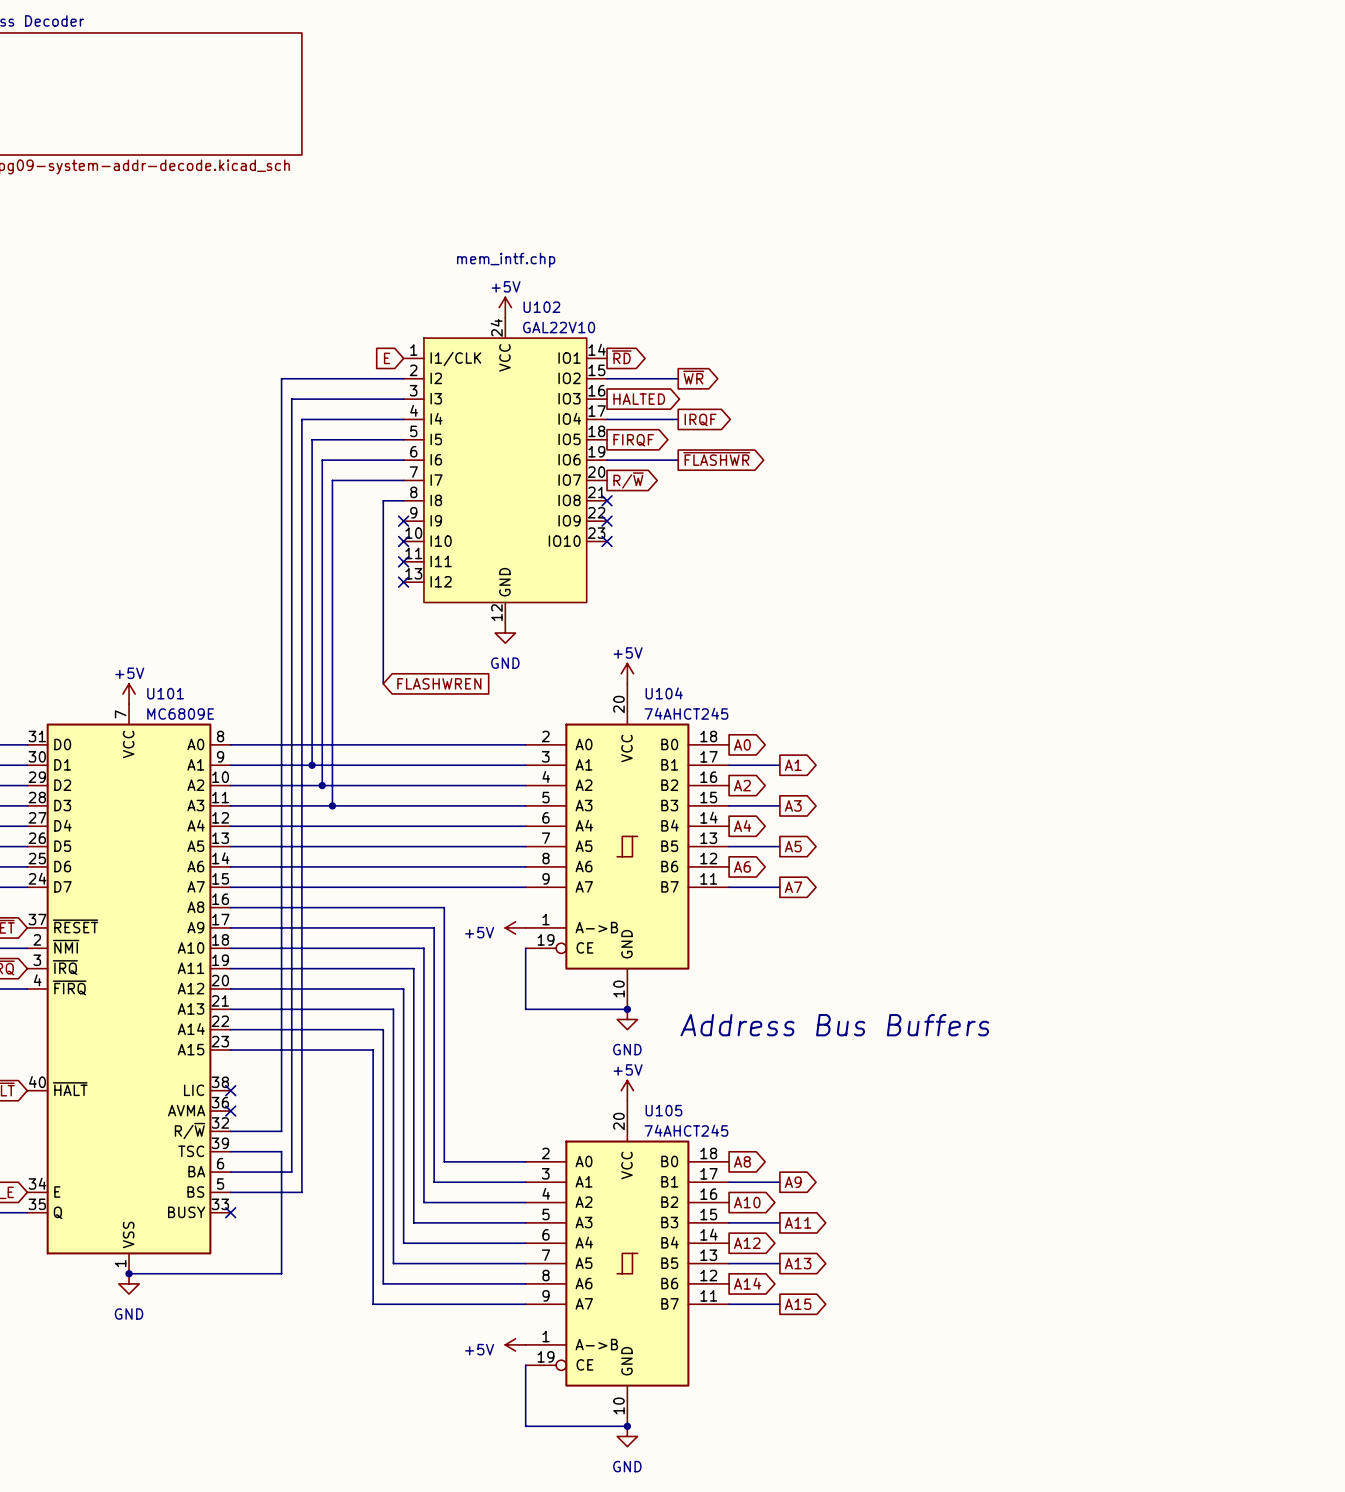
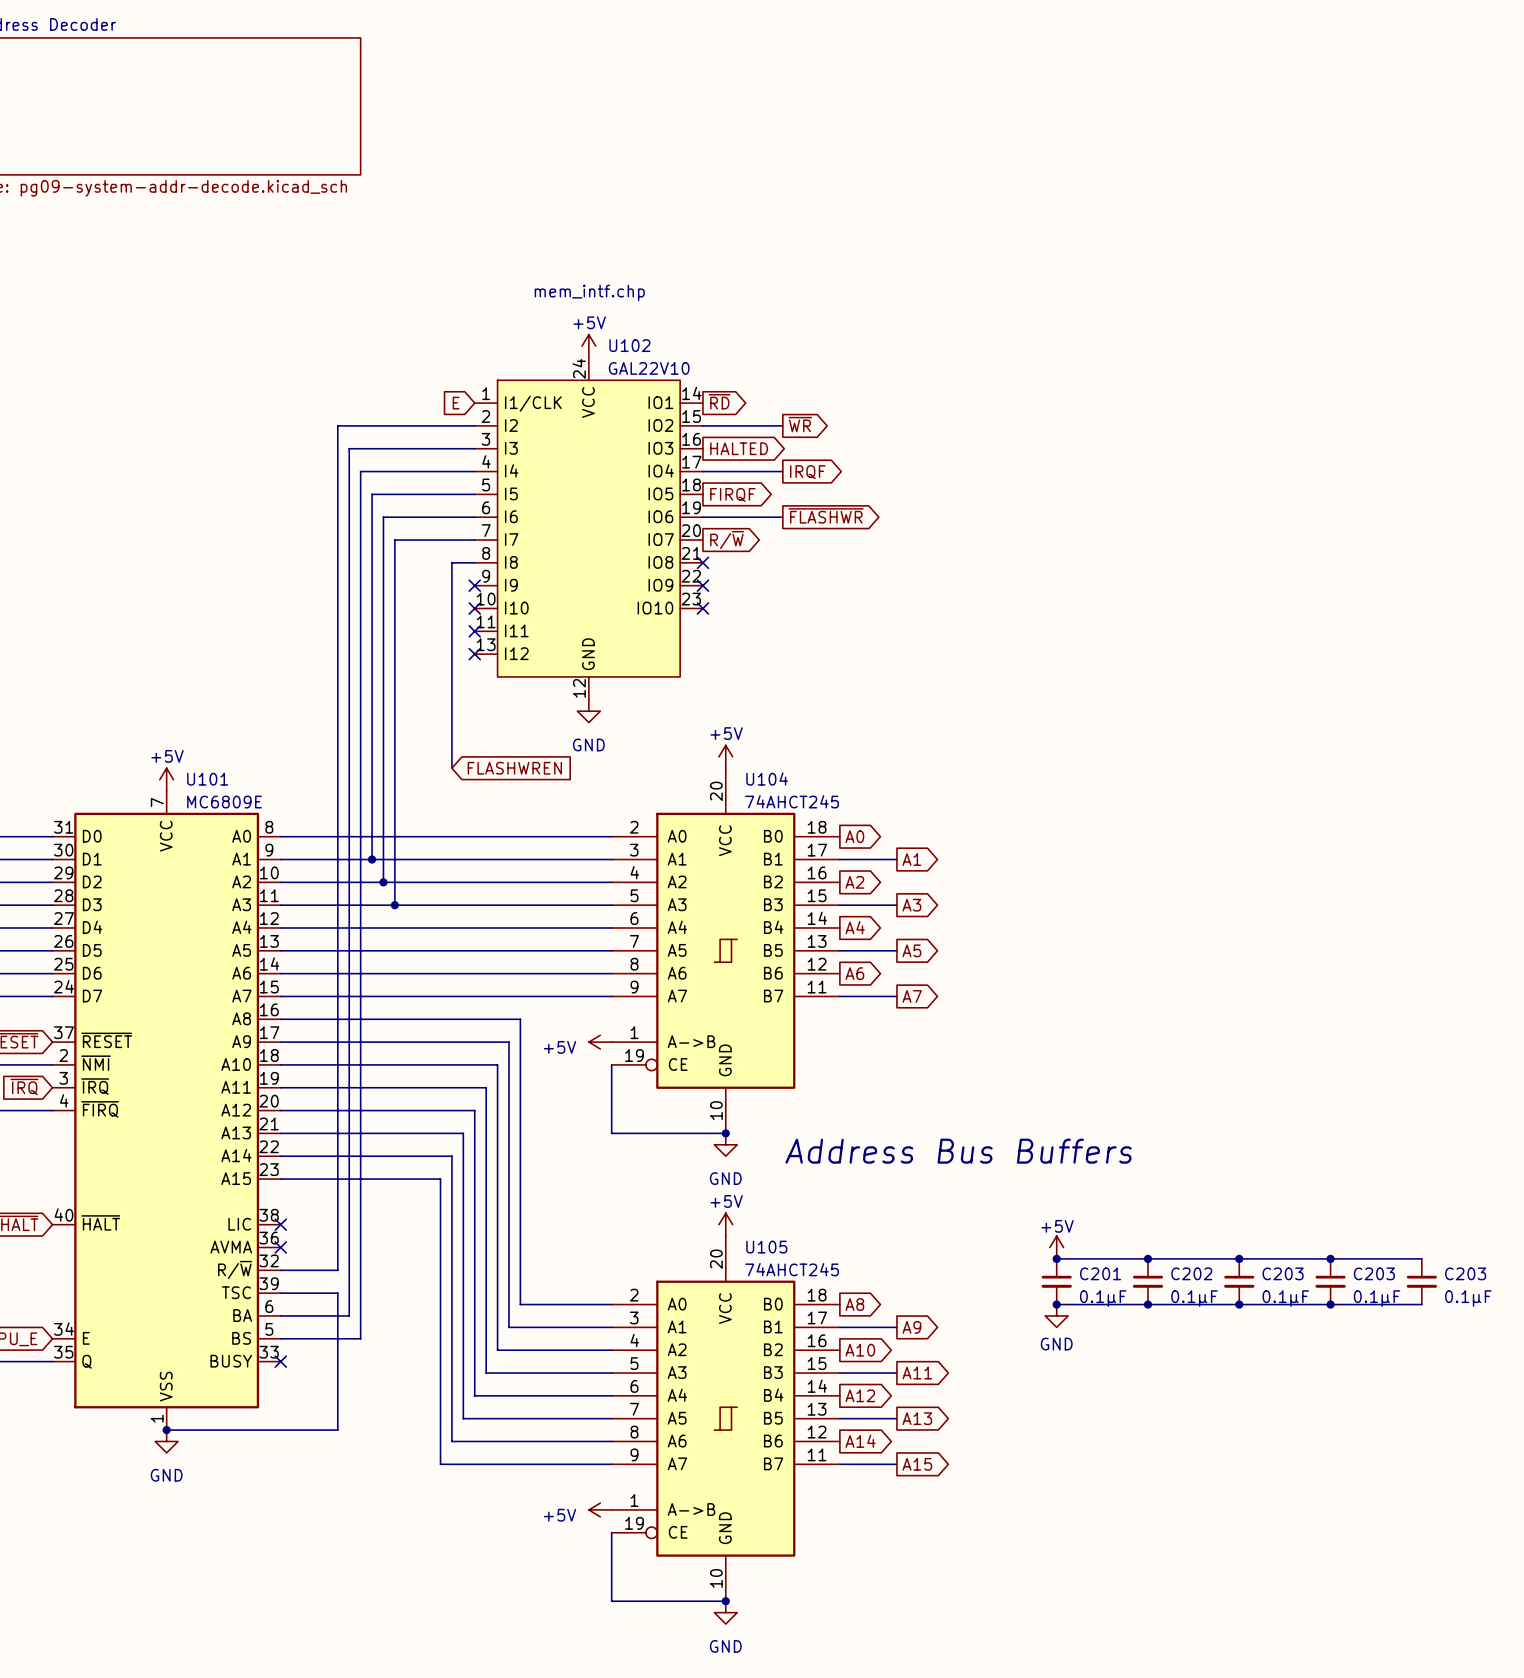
power symbol: none -> +5V (1056, 1247)
wire: none -> (1056, 1258) (1421, 1258)
junction: none -> (1056, 1258)
junction: none -> (1147, 1258)
junction: none -> (1239, 1258)
junction: none -> (1330, 1258)
C201: none -> 0.1µF (1056, 1281)
C202: none -> 0.1µF (1147, 1281)
C203: none -> 0.1µF (1239, 1281)
C203: none -> 0.1µF (1330, 1281)
C203: none -> 0.1µF (1421, 1281)
wire: none -> (1056, 1304) (1421, 1304)
junction: none -> (1056, 1304)
junction: none -> (1147, 1304)
junction: none -> (1239, 1304)
junction: none -> (1330, 1304)
power symbol: none -> GND (1056, 1315)

